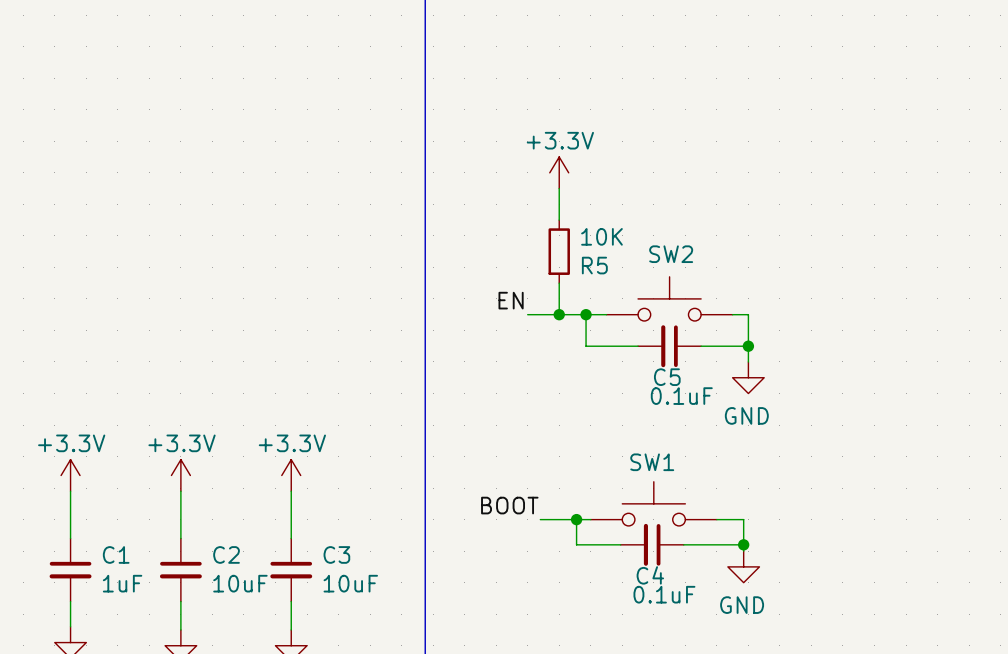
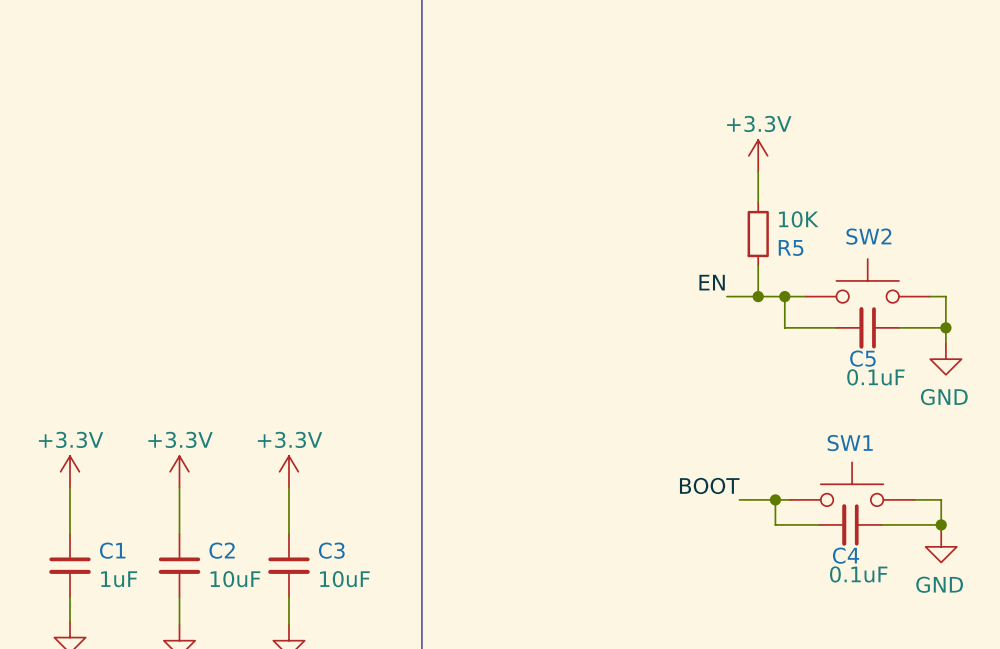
power symbol position: +3.3V (559, 172) -> +3.3V (758, 155)
wire: (559, 188) (559, 220) -> (758, 171) (758, 202)
R5 position: (559, 251) -> (758, 234)
wire: (559, 283) (559, 314) -> (758, 265) (758, 296)
SW2 position: (669, 298) -> (867, 280)
junction: none -> (758, 296)
junction: none -> (784, 296)
label position: EN (511, 300) -> EN (712, 282)
wire: (527, 314) (606, 314) -> (726, 296) (805, 296)
junction: (559, 314) -> none
wire: (586, 314) (586, 346) (638, 346) -> (784, 296) (784, 327) (836, 327)
junction: (586, 314) -> none
wire: (732, 314) (748, 314) (748, 361) -> (930, 296) (945, 296) (945, 343)
junction: none -> (945, 327)
C5 position: (669, 346) -> (867, 327)
wire: (701, 346) (748, 346) -> (898, 327) (945, 327)
junction: (748, 346) -> none
power symbol: none -> GND (945, 359)
power symbol: GND (748, 377) -> none
SW1 position: (653, 503) -> (852, 484)
label position: BOOT (509, 505) -> BOOT (709, 485)
wire: (540, 519) (590, 519) -> (739, 499) (789, 499)
wire: (576, 519) (576, 544) (620, 544) -> (775, 499) (775, 524) (819, 524)
junction: (576, 519) -> none
wire: (716, 519) (743, 519) (743, 551) -> (914, 499) (941, 499) (941, 531)
junction: none -> (941, 524)
C4 position: (652, 544) -> (850, 524)
wire: (683, 544) (743, 544) -> (881, 524) (941, 524)
junction position: (743, 544) -> (775, 499)
power symbol: none -> GND (941, 546)
power symbol: GND (743, 566) -> none

